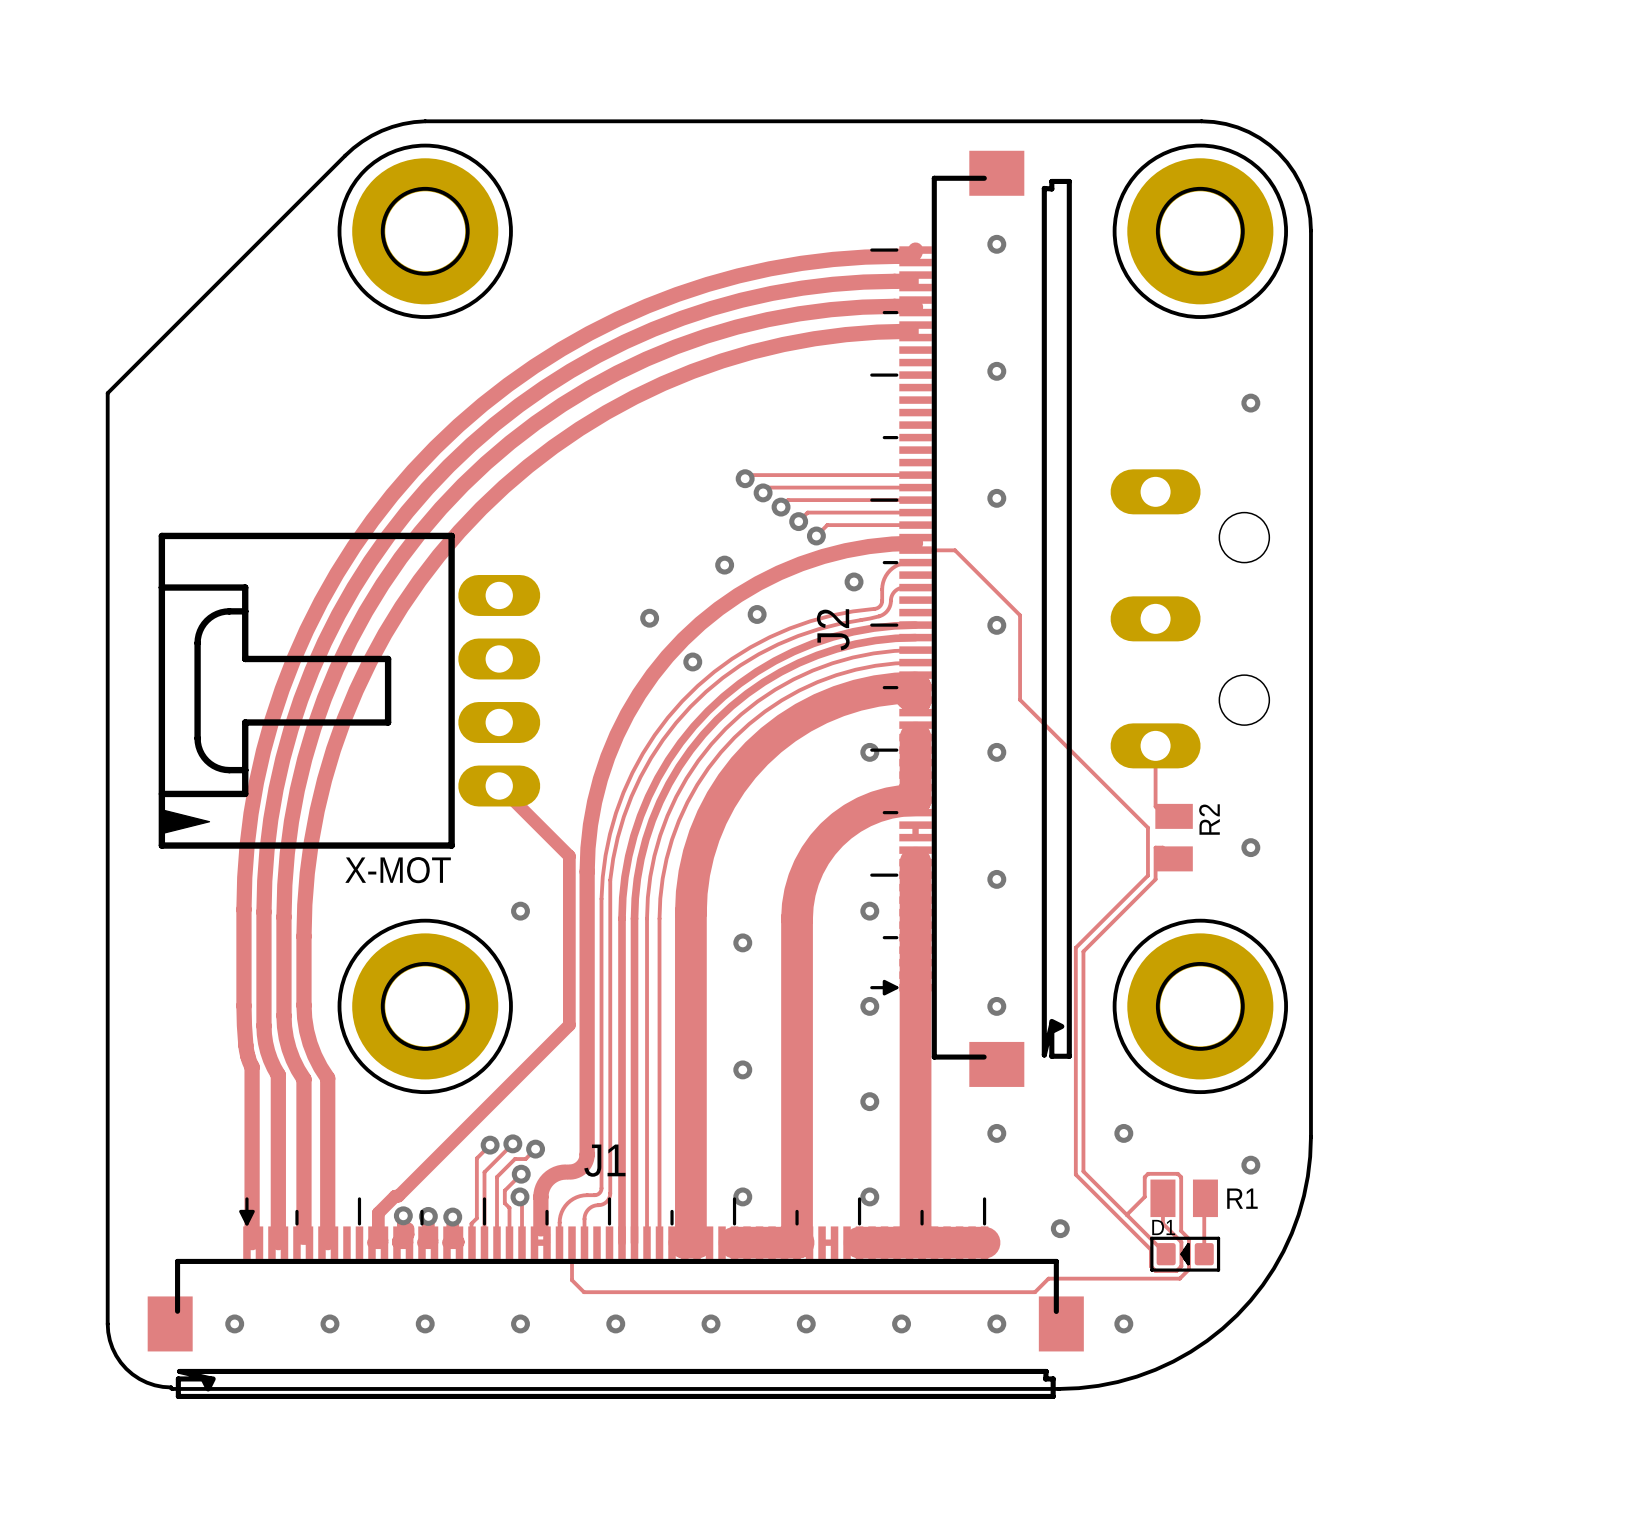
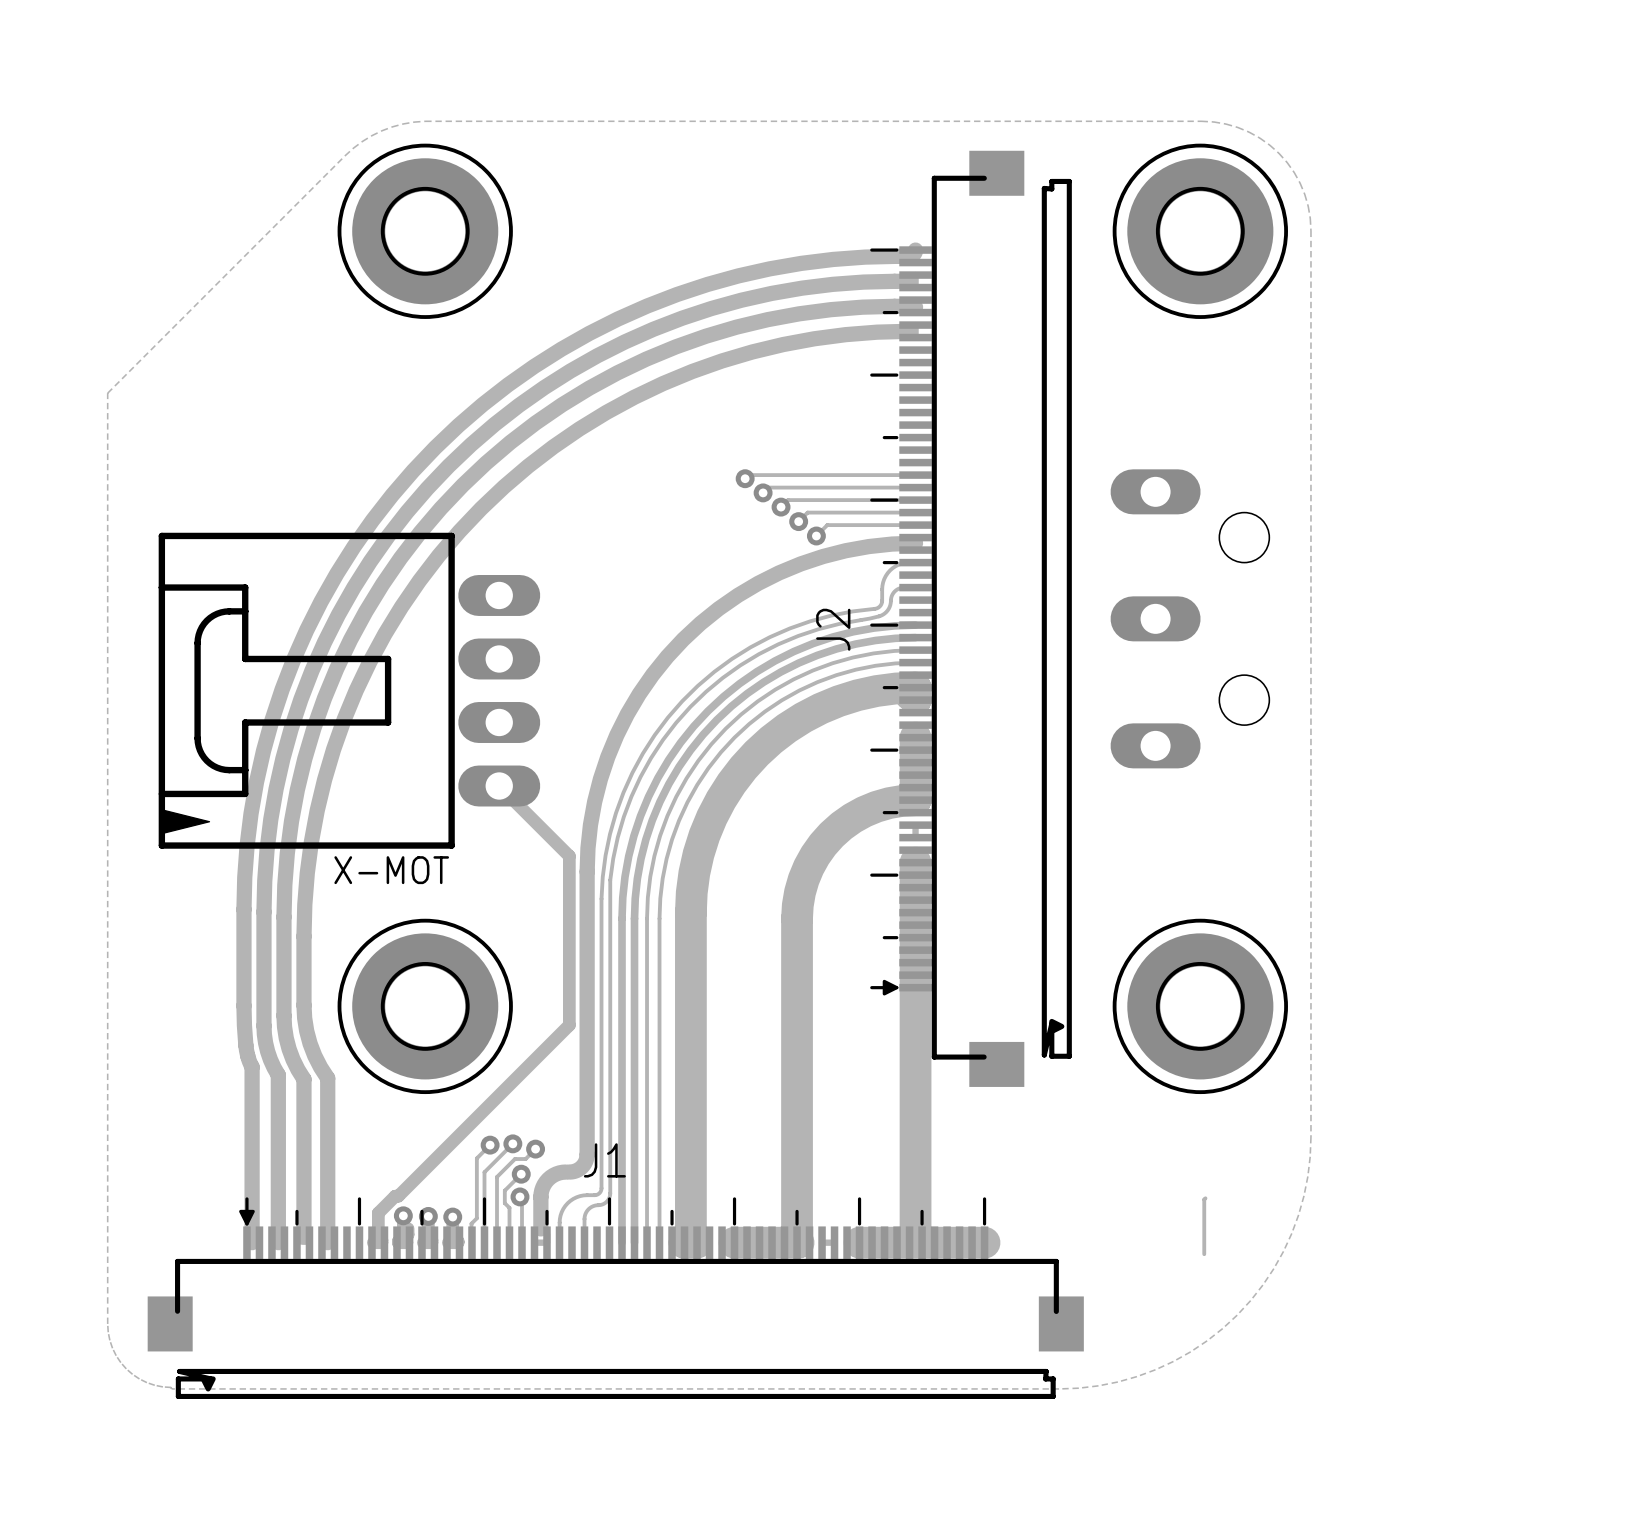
via: (996, 244) -> none
via: (996, 371) -> none
via: (1250, 403) -> none
via: (996, 498) -> none
track: (915, 550) (955, 550) (1020, 615) (1020, 699) (1147, 827) (1147, 875) (1075, 947) (1075, 1174) (1150, 1249) (1150, 1266) (1155, 1271) (1176, 1271) (1181, 1266) (1181, 1242) (1162, 1223) (1162, 1198) -> none
via: (724, 565) -> none
via: (854, 581) -> none
via: (757, 614) -> none
via: (649, 618) -> none
via: (996, 625) -> none
via: (692, 661) -> none
track: (1155, 745) (1155, 806) (1165, 816) (1174, 816) -> none
via: (869, 752) -> none
via: (996, 752) -> none
R2: (1174, 837) -> none
via: (1250, 847) -> none
track: (1174, 858) (1162, 847) (1155, 847) (1155, 879) (1083, 951) (1083, 1171) (1166, 1254) -> none
via: (996, 879) -> none
via: (520, 911) -> none
via: (869, 911) -> none
via: (742, 942) -> none
via: (869, 1006) -> none
via: (996, 1006) -> none
via: (742, 1069) -> none
via: (869, 1101) -> none
via: (996, 1133) -> none
via: (1123, 1133) -> none
via: (1250, 1165) -> none
via: (742, 1196) -> none
via: (869, 1196) -> none
R1: (1184, 1198) -> none
track: (1127, 1215) (1144, 1196) (1144, 1177) (1148, 1173) (1177, 1173) (1181, 1177) (1181, 1231) (1189, 1238) (1189, 1269) (1179, 1278) (1048, 1278) (1035, 1292) (584, 1292) (572, 1280) (572, 1242) -> none
via: (1060, 1228) -> none
D1: (1185, 1254) -> none
via: (234, 1323) -> none
via: (329, 1323) -> none
via: (425, 1323) -> none
via: (520, 1323) -> none
via: (615, 1323) -> none
via: (711, 1323) -> none
via: (806, 1323) -> none
via: (901, 1323) -> none
via: (996, 1323) -> none
via: (1123, 1323) -> none
board edge: (171, 1387) (146, 1382) (126, 1368) (112, 1348) (107, 1323) (107, 393) (345, 155) (371, 135) (403, 123) (425, 121) (1201, 121) (1237, 127) (1269, 145) (1287, 162) (1300, 183) (1308, 206) (1310, 230) (1310, 1137) (1307, 1176) (1298, 1214) (1291, 1233) (1273, 1268) (1250, 1300) (1222, 1328) (1190, 1351) (1173, 1361) (1136, 1376) (1117, 1381) (1078, 1388) (170, 1387) -> none

